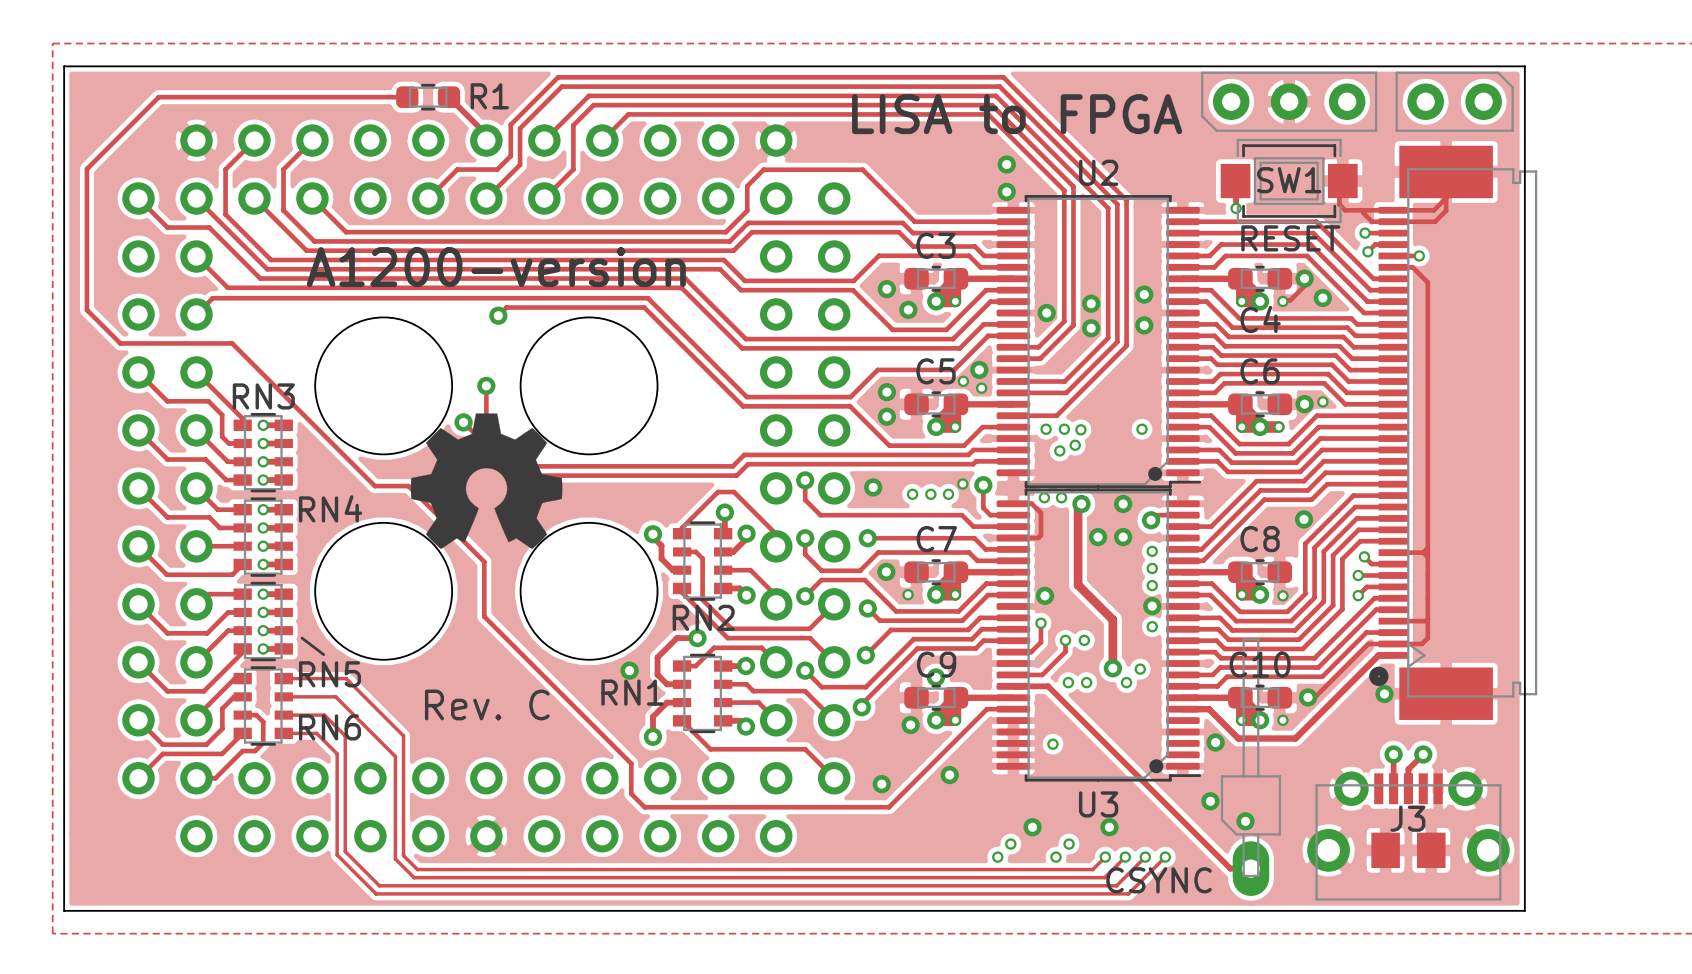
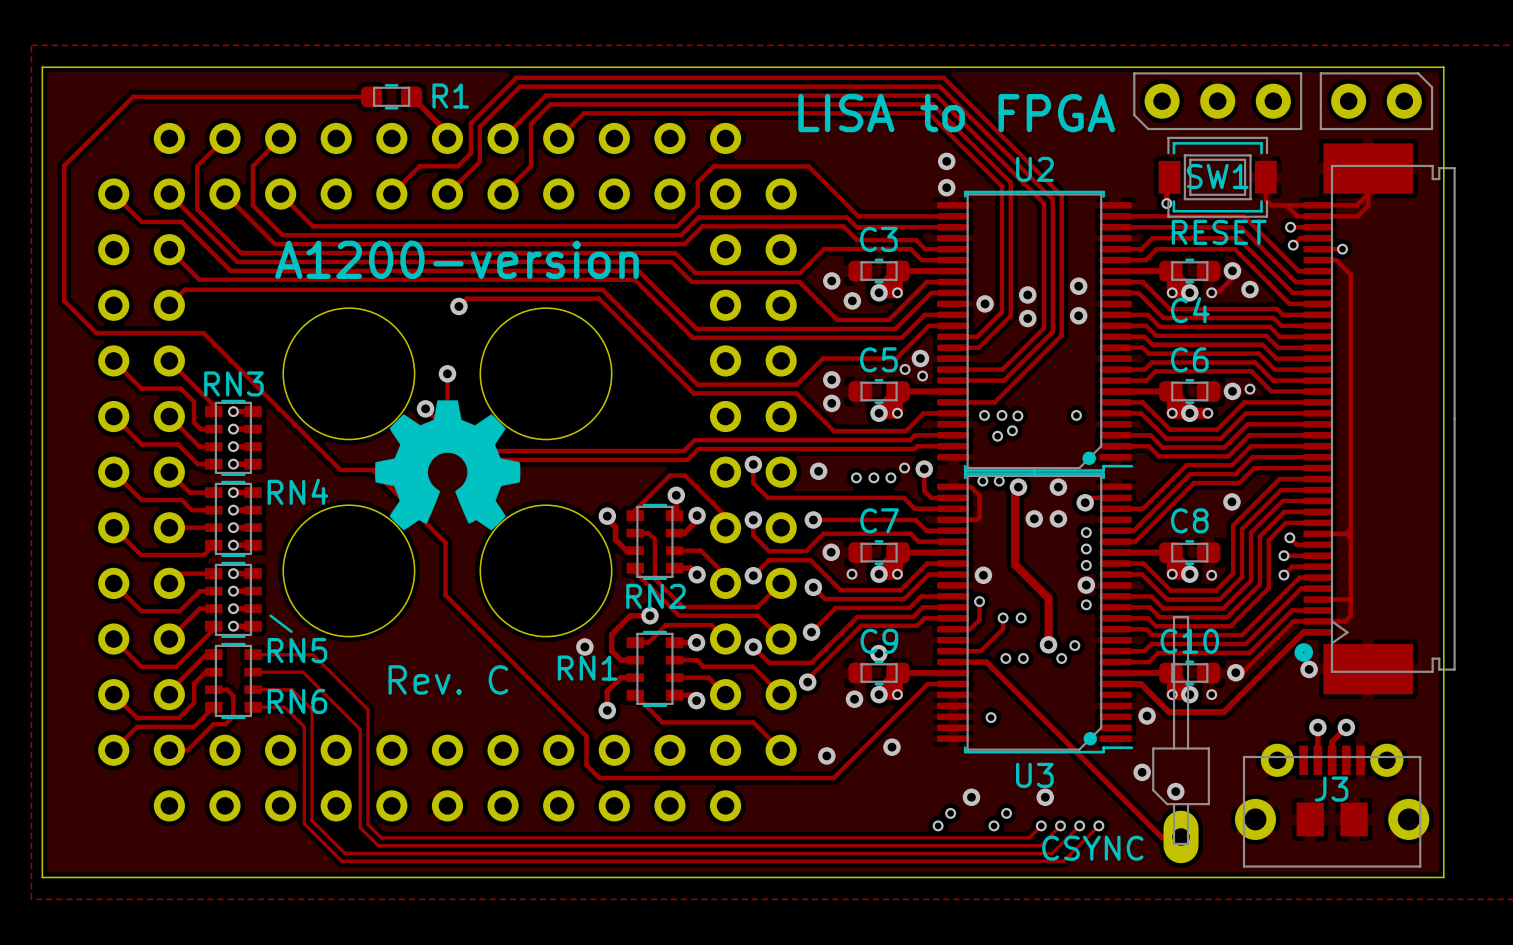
SW1 footprint: [1220, 138, 1358, 224] -> [1158, 136, 1277, 218]

